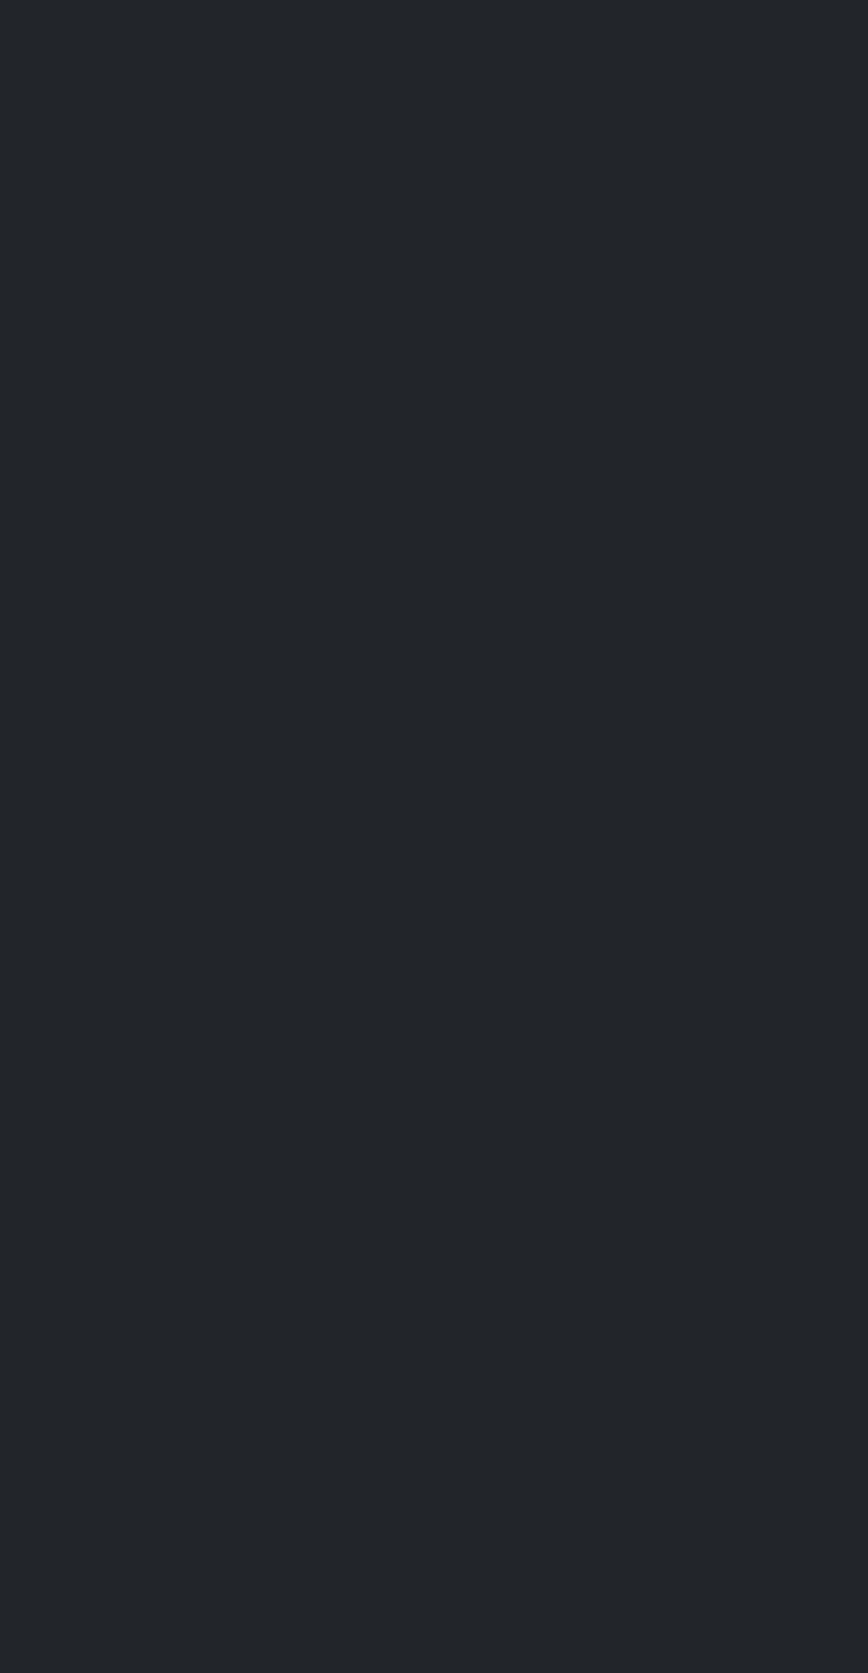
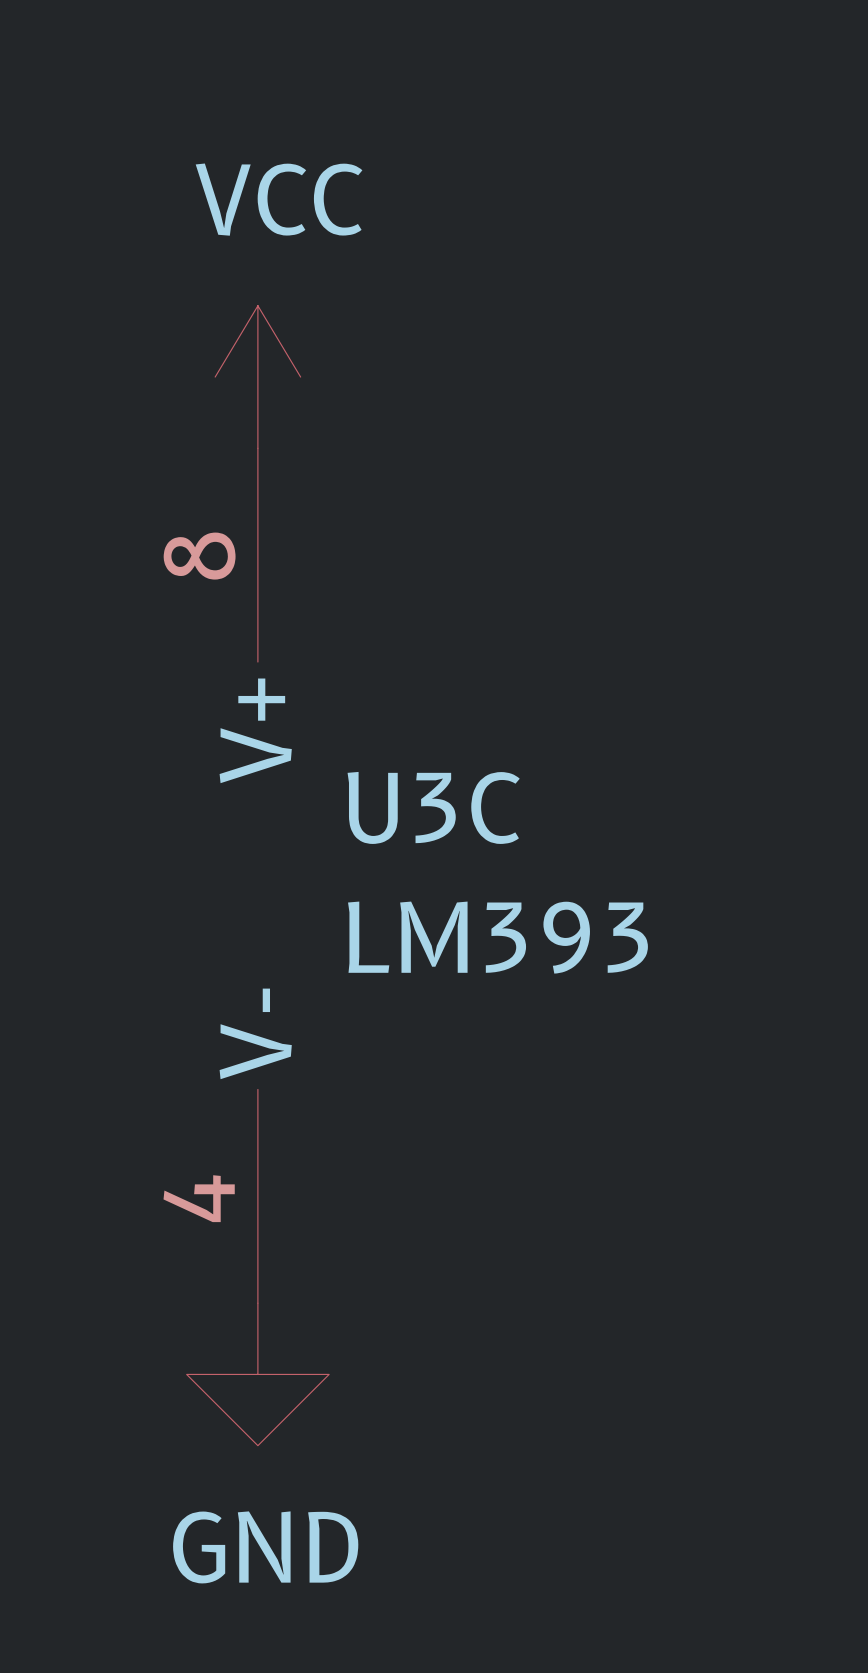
power symbol: none -> VCC (257, 377)
U3C: none -> LM393 (257, 875)
power symbol: none -> GND (257, 1374)

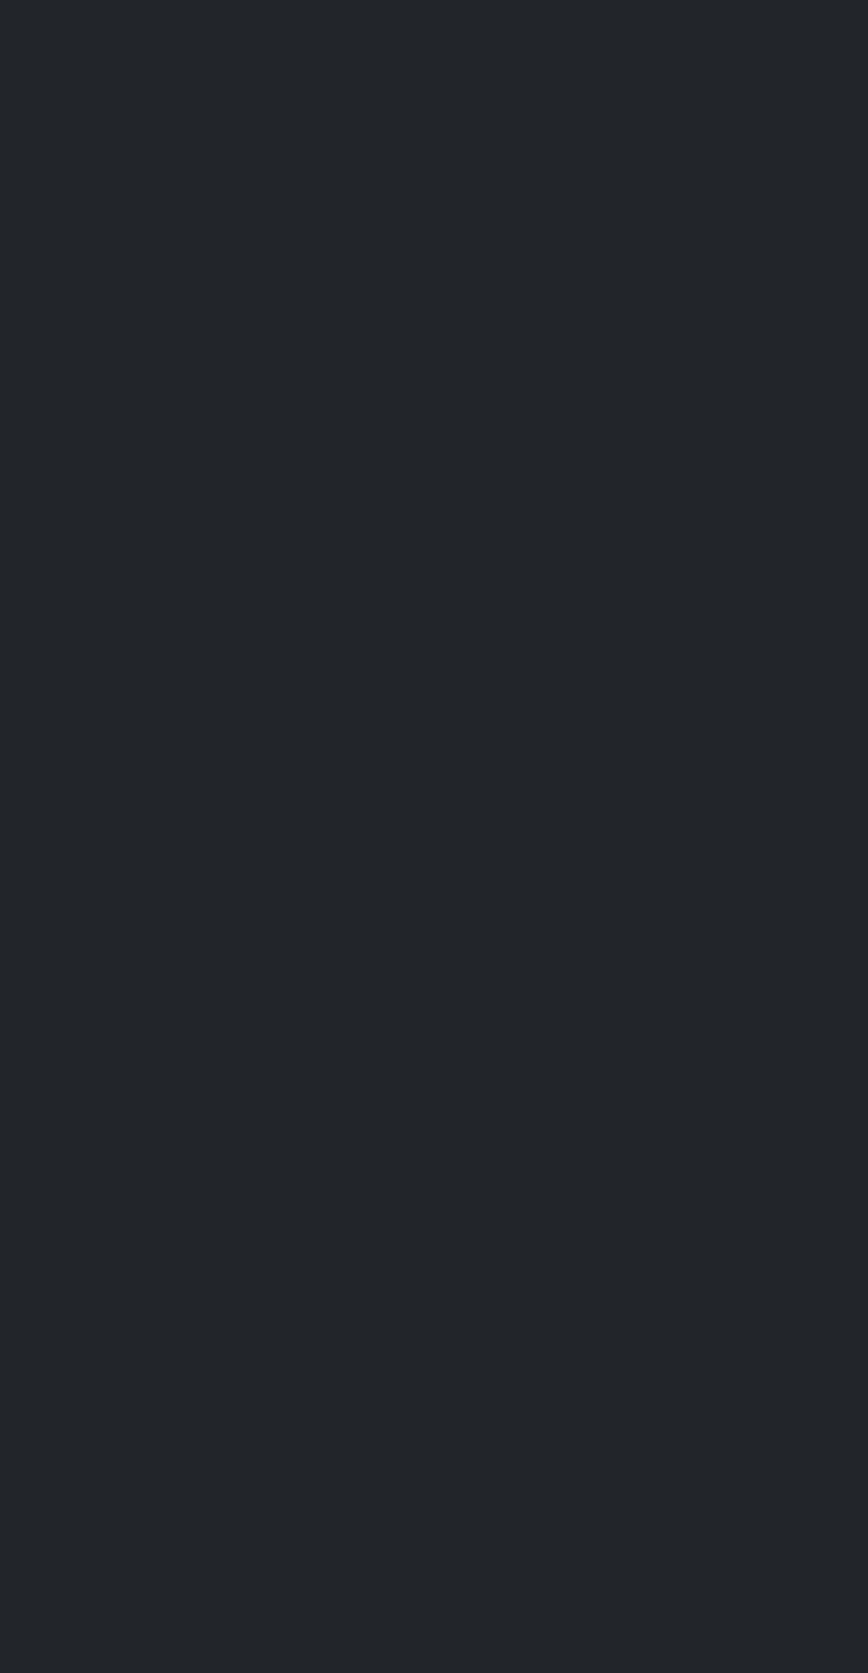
power symbol: VCC (257, 377) -> none
U3C: LM393 (257, 875) -> none
power symbol: GND (257, 1374) -> none

